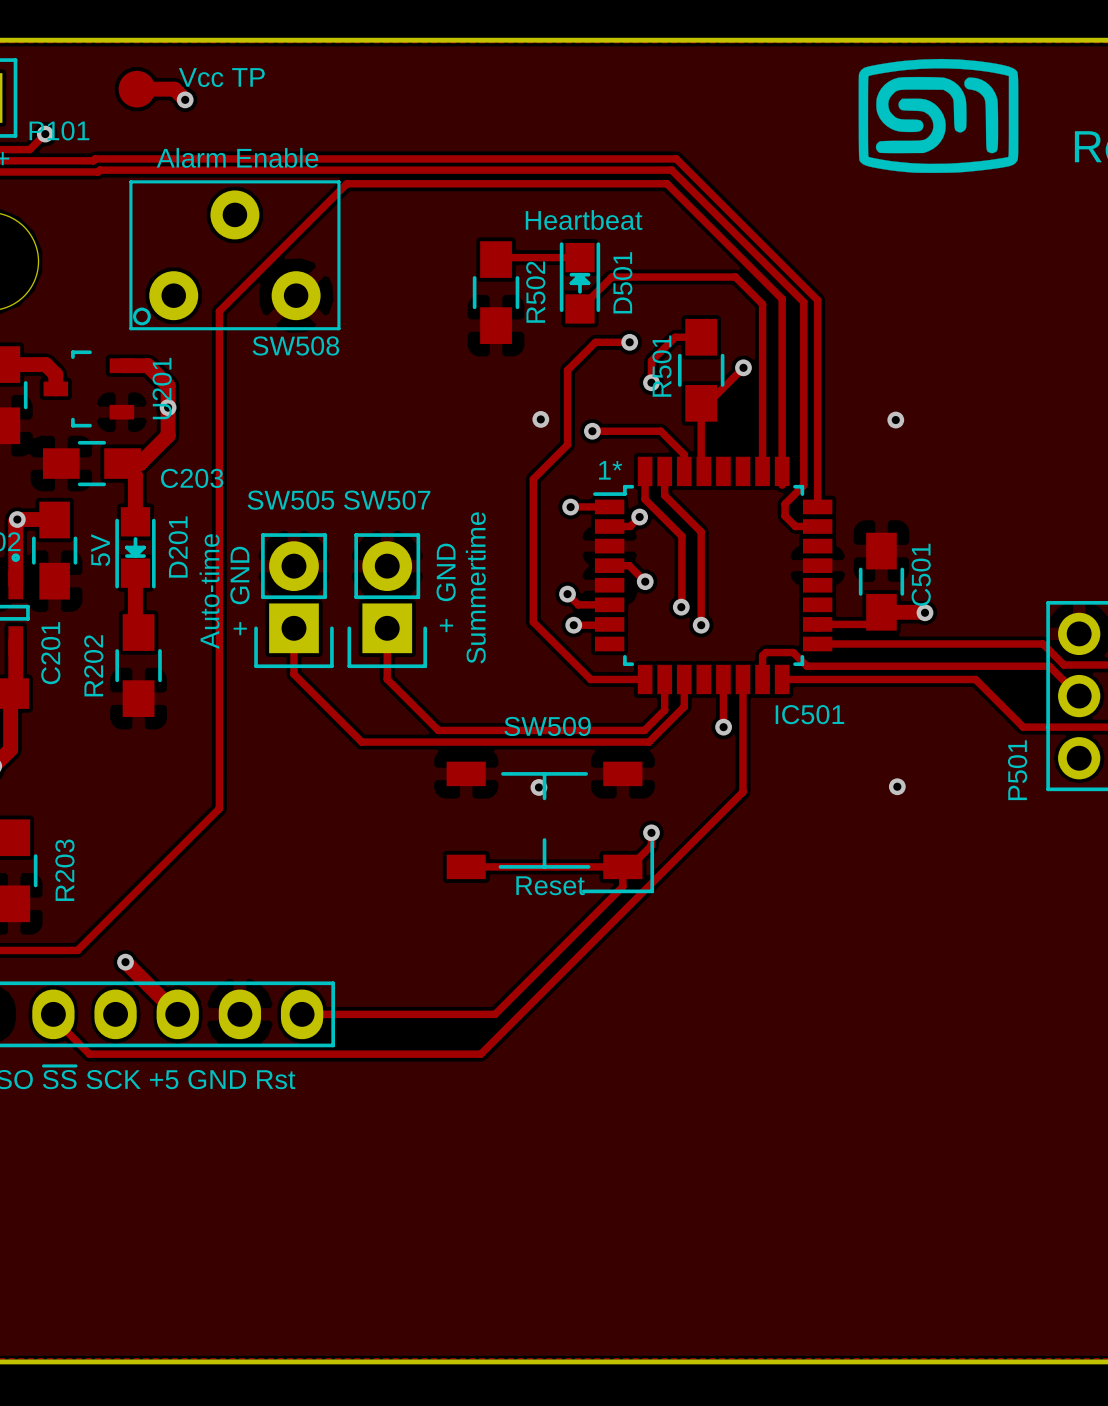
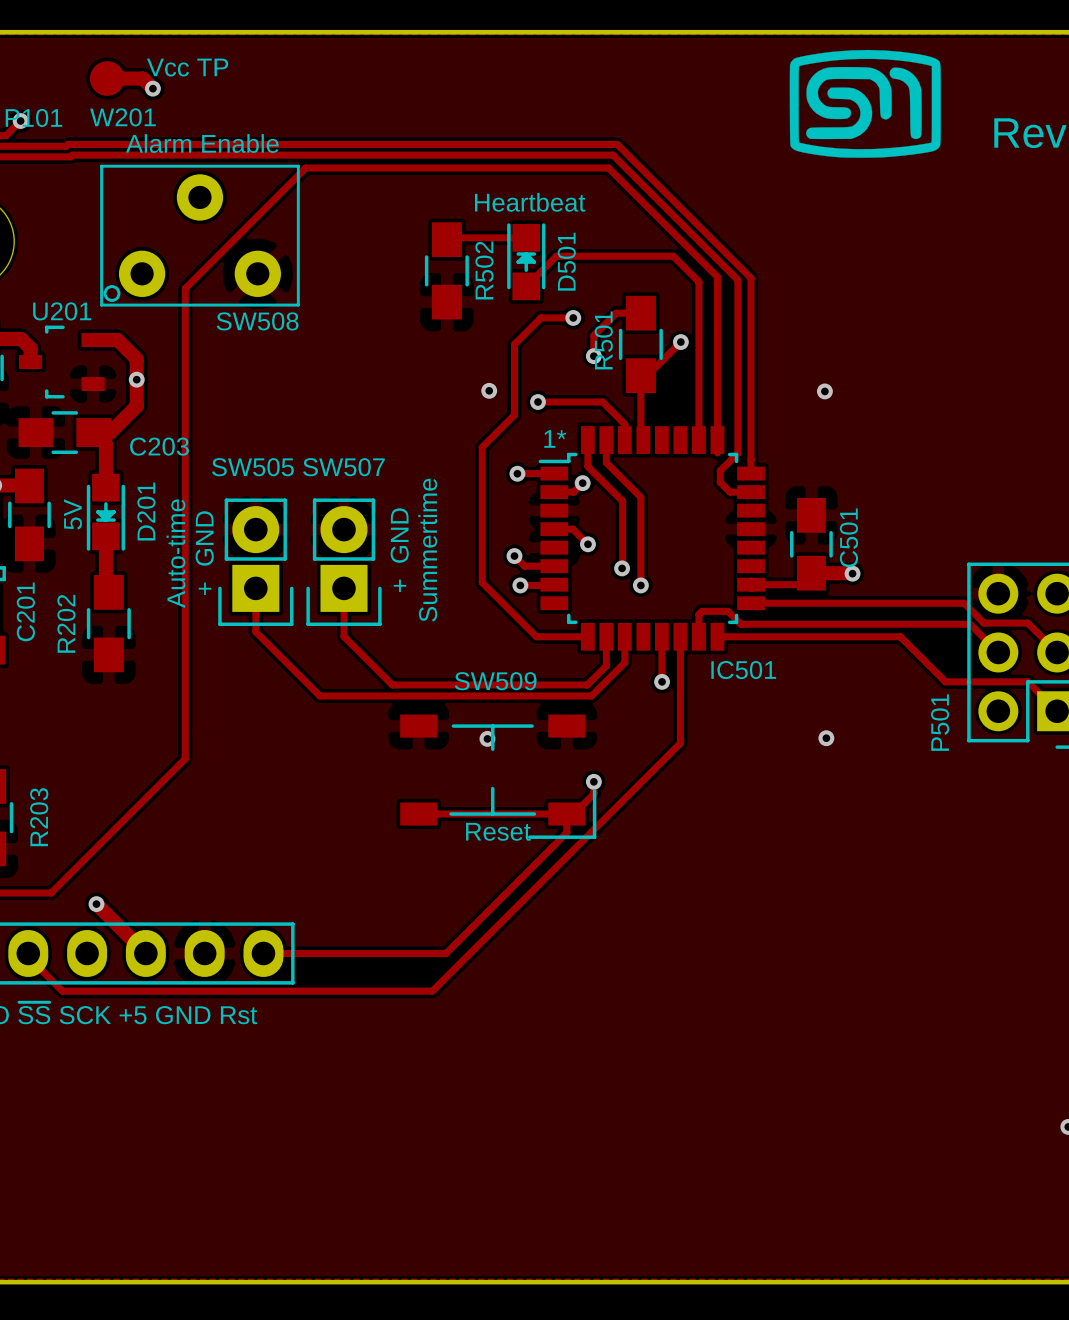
W201 name: none -> W201 (122, 117)
U201 name rotation: 0° (162, 388) -> 90° clockwise (62, 311)
U201 name position: U201 (162, 388) -> U201 (62, 311)

